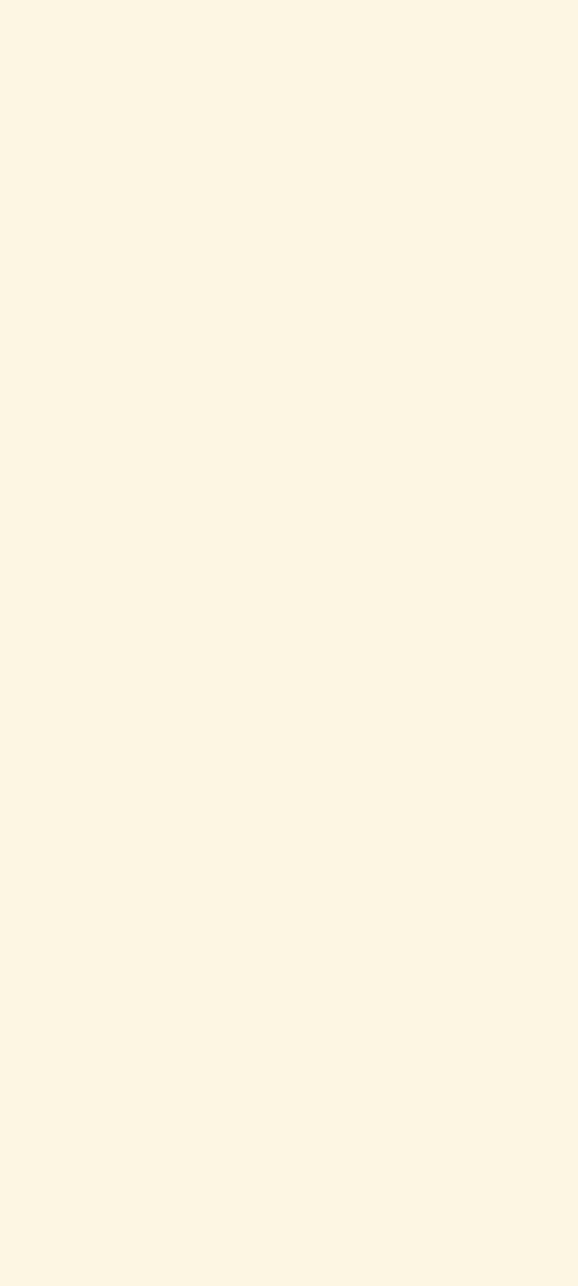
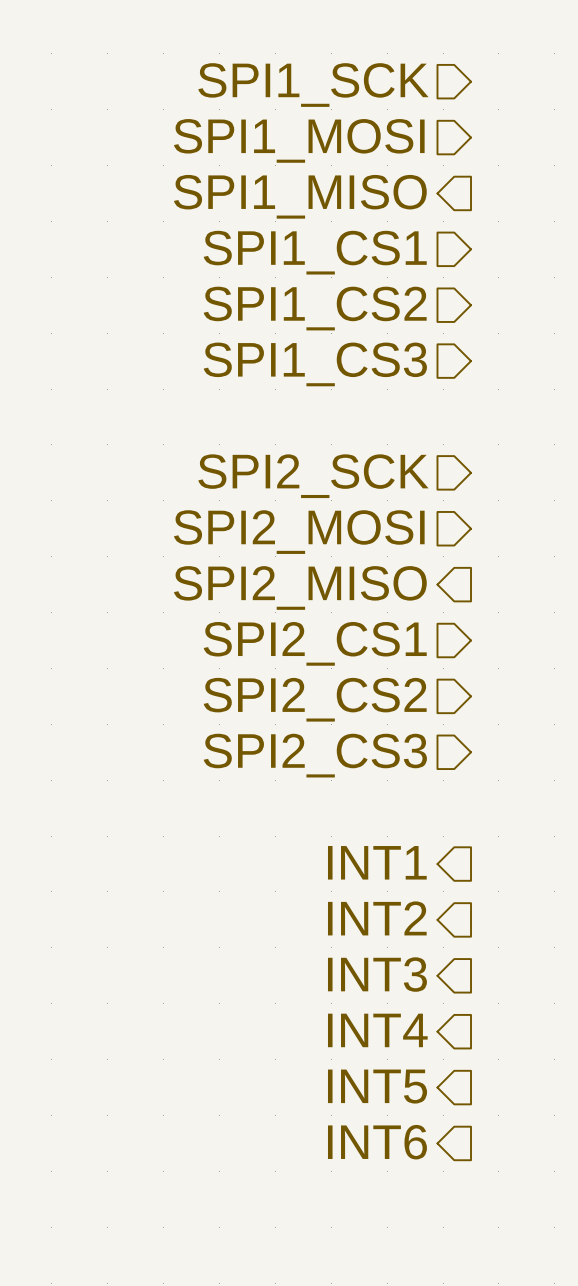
hierarchical label: none -> SPI1_SCK (313, 85)
hierarchical label: none -> SPI1_MOSI (299, 140)
hierarchical label: none -> SPI1_MISO (300, 196)
hierarchical label: none -> SPI1_CS1 (315, 252)
hierarchical label: none -> SPI1_CS2 (315, 308)
hierarchical label: none -> SPI1_CS3 (315, 364)
hierarchical label: none -> SPI2_SCK (313, 476)
hierarchical label: none -> SPI2_MOSI (299, 532)
hierarchical label: none -> SPI2_MISO (300, 587)
hierarchical label: none -> SPI2_CS1 (315, 643)
hierarchical label: none -> SPI2_CS2 (315, 699)
hierarchical label: none -> SPI2_CS3 (315, 755)
hierarchical label: none -> INT1 (377, 862)
hierarchical label: none -> INT2 (377, 918)
hierarchical label: none -> INT3 (377, 974)
hierarchical label: none -> INT4 (377, 1030)
hierarchical label: none -> INT5 (377, 1086)
hierarchical label: none -> INT6 (377, 1142)

